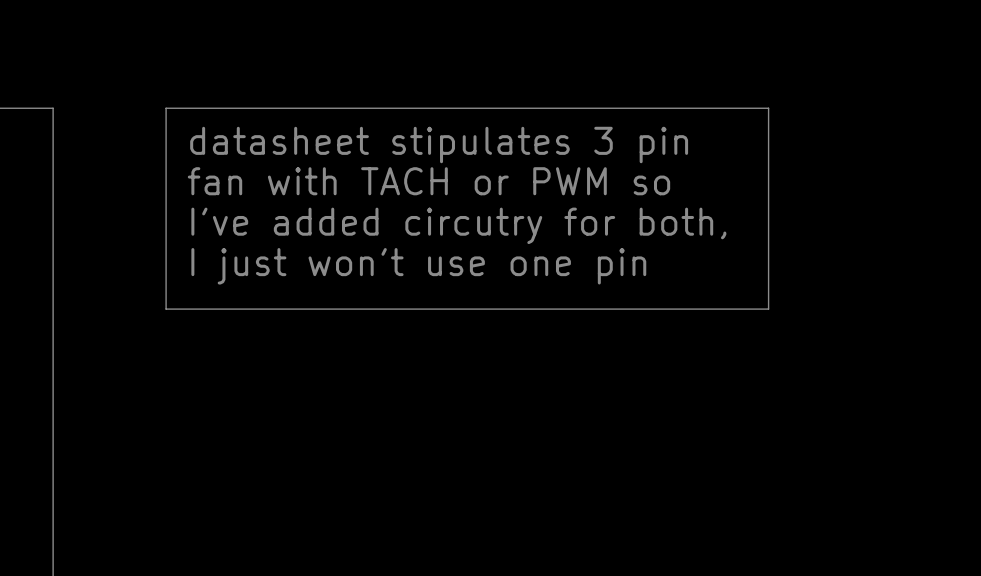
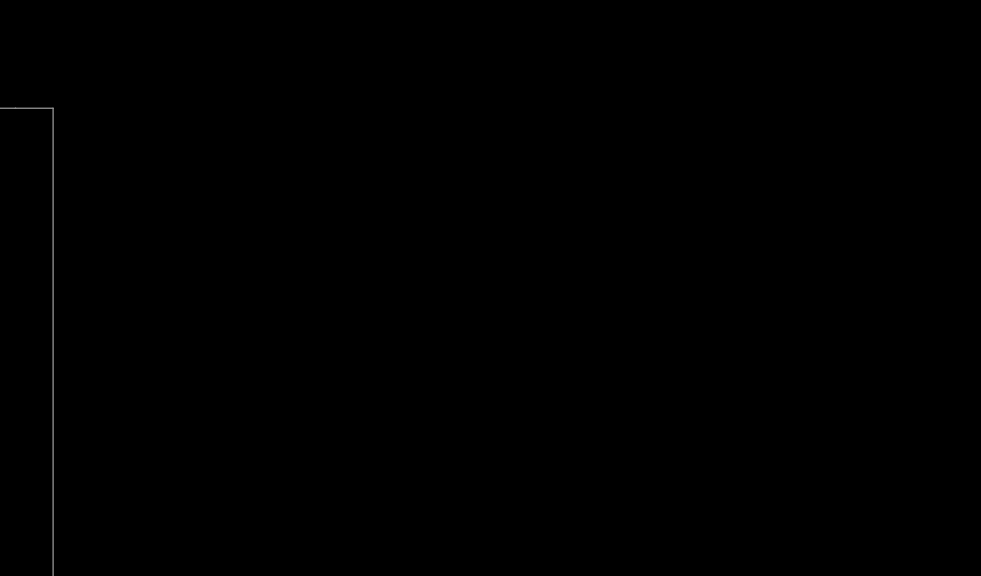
line: (166, 108) (768, 108) (768, 309) (166, 309) (166, 108) -> none
text: datasheet stipulates 3 pin (439, 145) -> none
text: fan with TACH or PWM so (428, 181) -> none
text: I've added circutry for both, (458, 225) -> none
text: I just won't use one pin (418, 266) -> none

